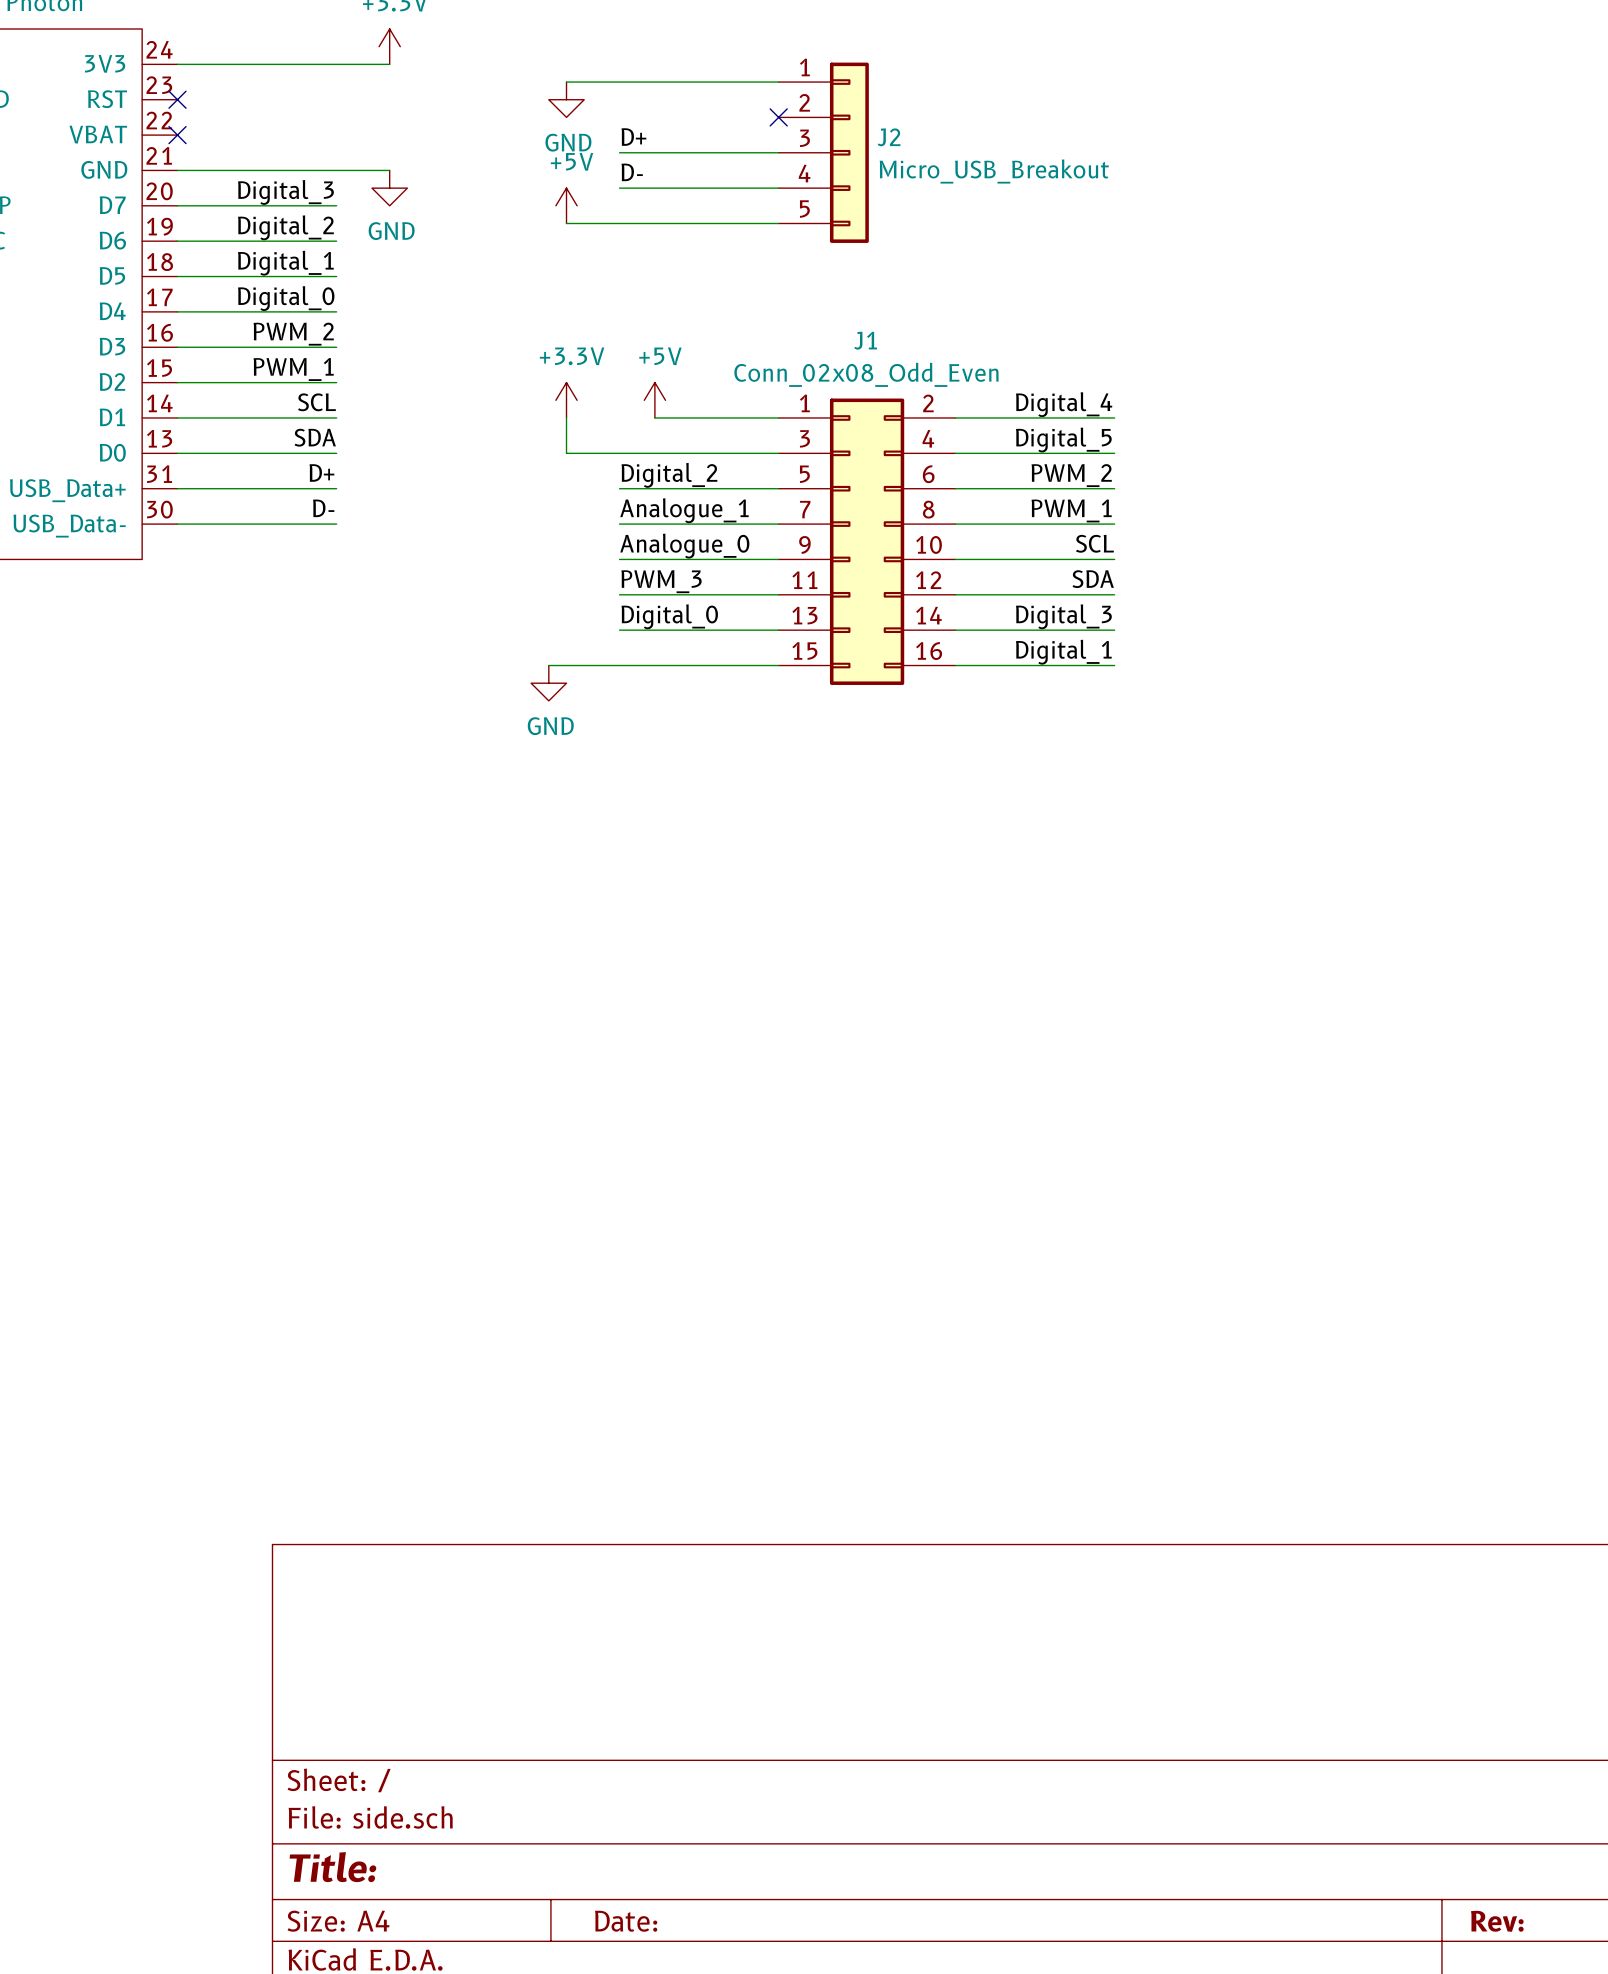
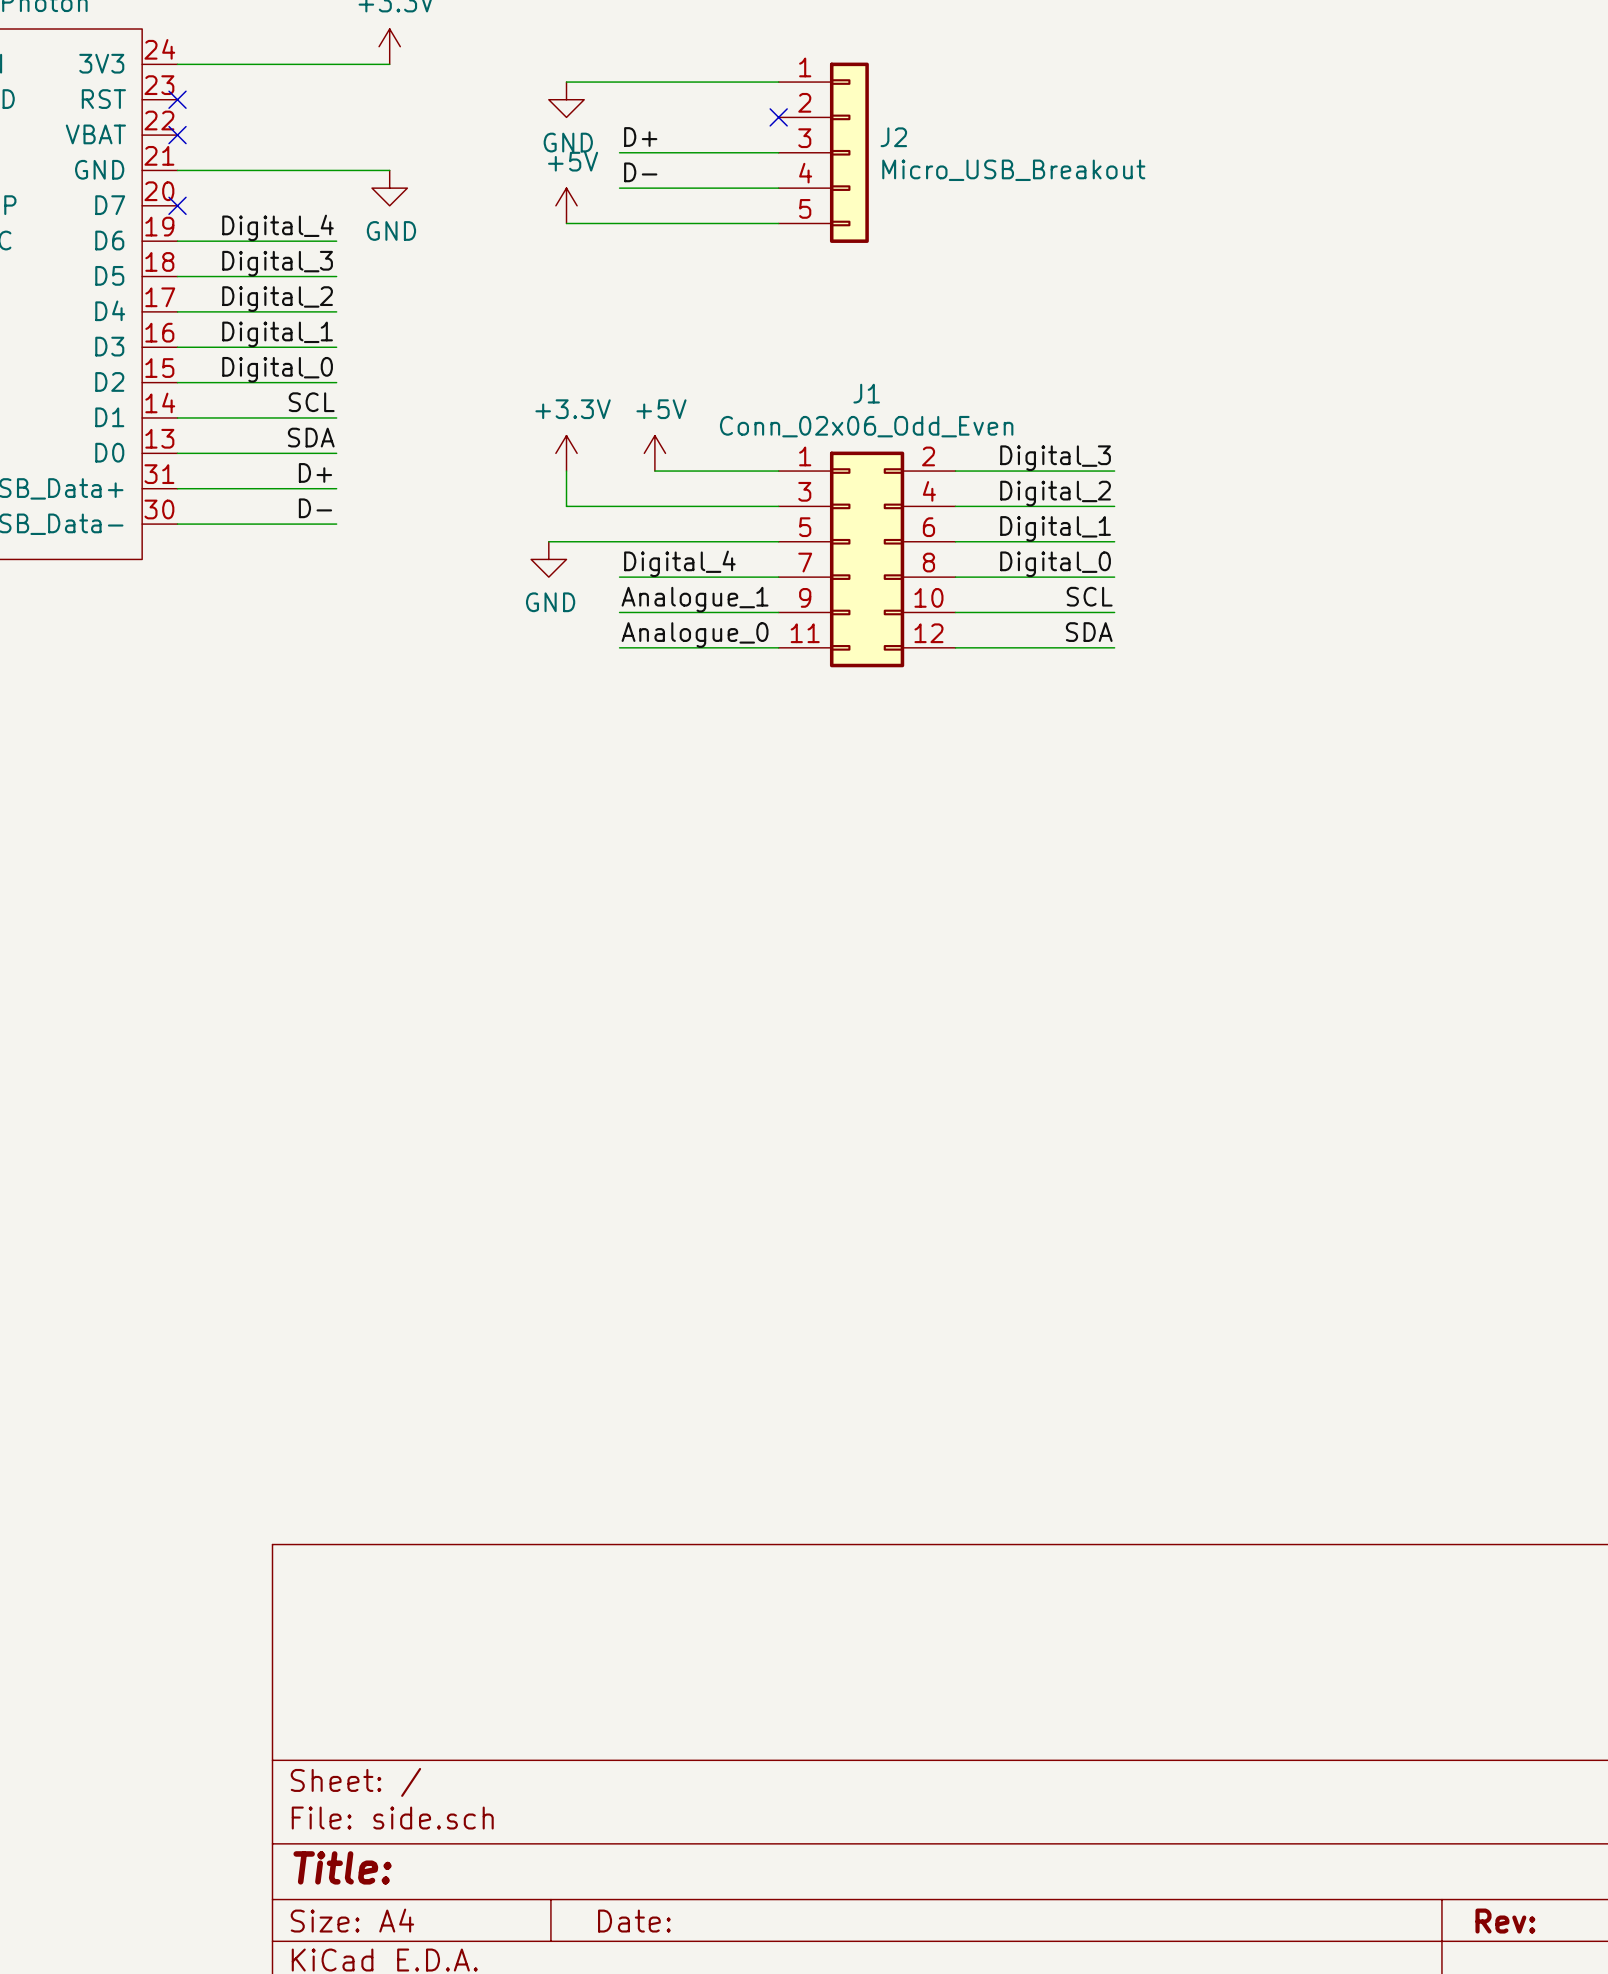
label: Digital_3 (285, 192) -> none
wire: (177, 205) (336, 205) -> none
no-connect mark: none -> (177, 205)
label: Digital_2 (285, 227) -> Digital_4 (278, 227)
label: Digital_1 (285, 263) -> Digital_3 (277, 263)
label: Digital_0 (286, 298) -> Digital_2 (277, 299)
label: PWM_2 (293, 334) -> Digital_1 (277, 334)
J1 name position: J1 (865, 340) -> J1 (866, 393)
label: PWM_1 (293, 369) -> Digital_0 (277, 369)
J1 value: Conn_02x08_Odd_Even (866, 374) -> Conn_02x06_Odd_Even (866, 426)
J1 symbol: [778, 398, 956, 685] -> [778, 451, 956, 668]
power symbol position: +3.3V (566, 400) -> +3.3V (566, 453)
power symbol position: +5V (654, 400) -> +5V (654, 453)
label: Digital_4 (1064, 404) -> none
wire: (566, 417) (566, 453) (778, 453) -> (566, 471) (566, 506) (778, 506)
wire: (654, 417) (778, 417) -> (654, 471) (778, 471)
wire: (955, 417) (1114, 417) -> (955, 471) (1114, 471)
label: Digital_5 (1063, 439) -> none
wire: (955, 453) (1114, 453) -> (955, 506) (1114, 506)
label: Digital_2 (669, 475) -> none
label: PWM_2 (1071, 475) -> none
wire: (619, 488) (778, 488) -> none
wire: (955, 488) (1114, 488) -> (955, 541) (1114, 541)
label: none -> Digital_2 (1055, 493)
label position: Analogue_1 (684, 510) -> Analogue_1 (695, 599)
label: PWM_1 (1071, 510) -> none
wire: (619, 524) (778, 524) -> (619, 577) (778, 577)
wire: (955, 524) (1114, 524) -> (955, 577) (1114, 577)
label position: SCL (1094, 543) -> SCL (1089, 596)
label position: Analogue_0 (684, 546) -> Analogue_0 (695, 635)
wire: (619, 559) (778, 559) -> (619, 612) (778, 612)
wire: (955, 559) (1114, 559) -> (955, 612) (1114, 612)
label: none -> Digital_4 (679, 563)
label: none -> Digital_0 (1055, 564)
label position: SDA (1093, 579) -> SDA (1089, 632)
label: PWM_3 (661, 581) -> none
wire: (619, 594) (778, 594) -> (619, 647) (778, 647)
wire: (955, 594) (1114, 594) -> (955, 647) (1114, 647)
label: Digital_0 (669, 616) -> none
label position: Digital_3 (1063, 616) -> Digital_3 (1055, 458)
wire: (619, 630) (778, 630) -> none
wire: (955, 630) (1114, 630) -> none
label position: Digital_1 (1063, 652) -> Digital_1 (1055, 528)
wire: (548, 665) (778, 665) -> (548, 541) (778, 541)
wire: (955, 665) (1114, 665) -> none
power symbol position: GND (548, 683) -> GND (548, 559)

